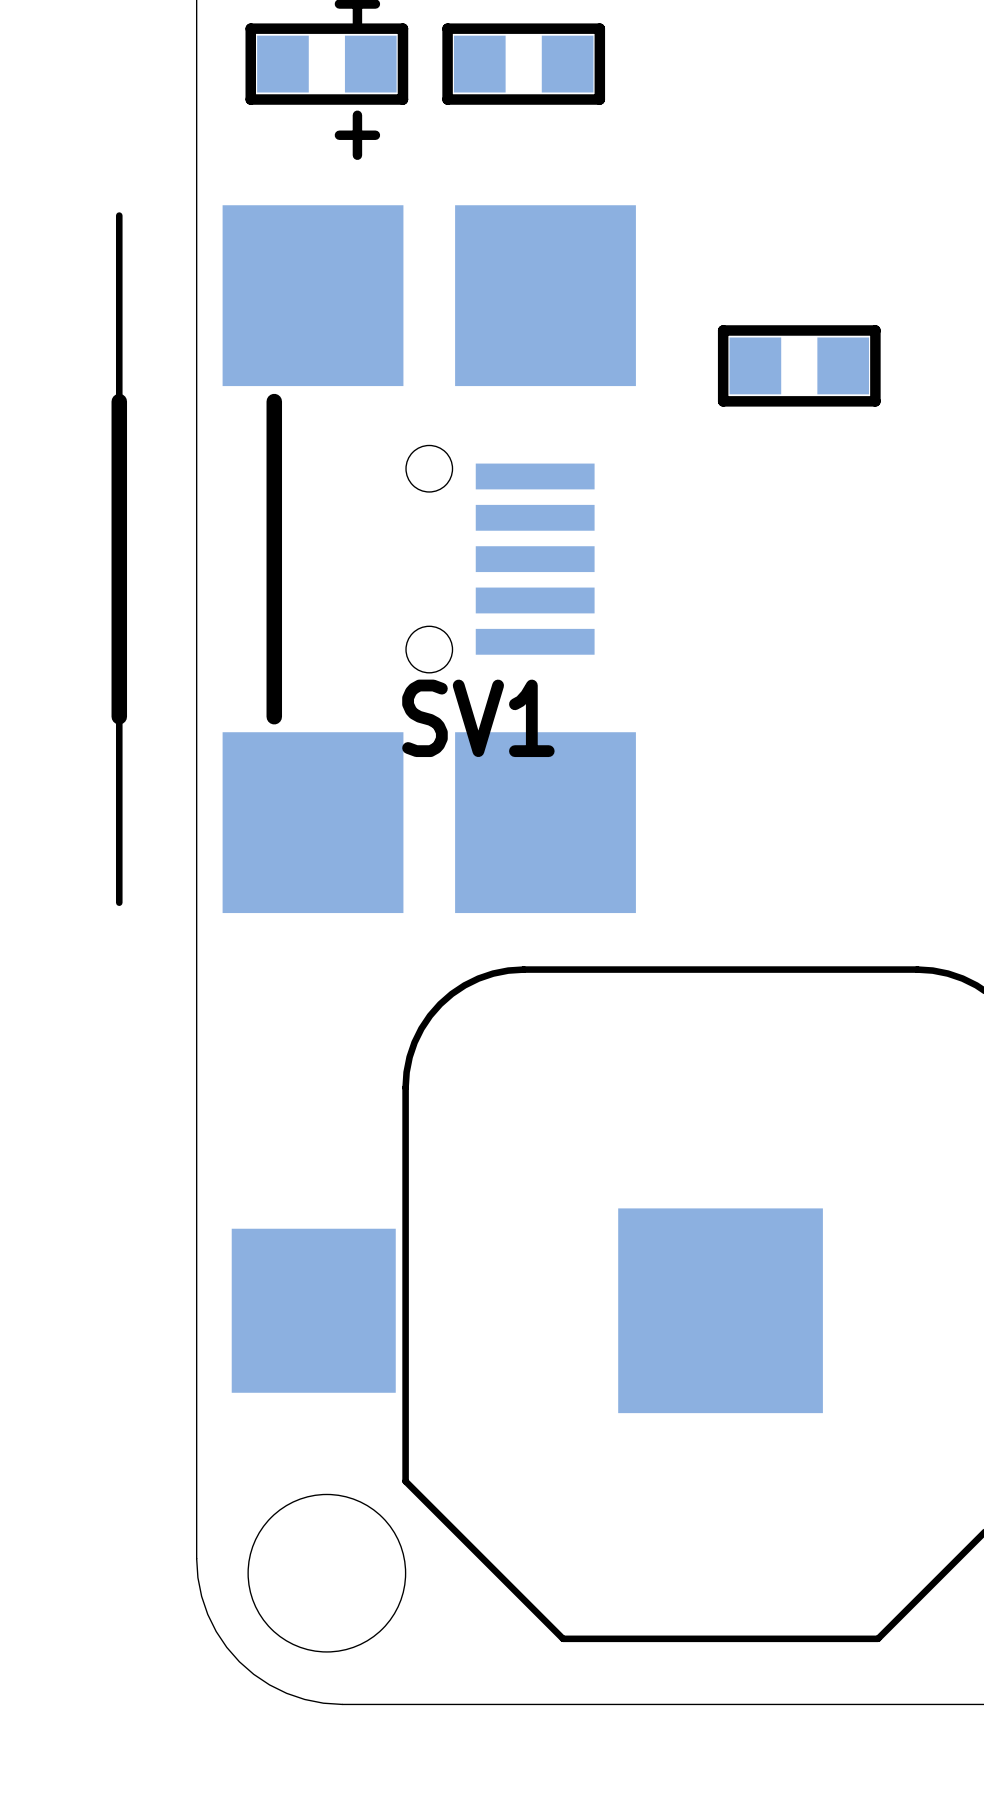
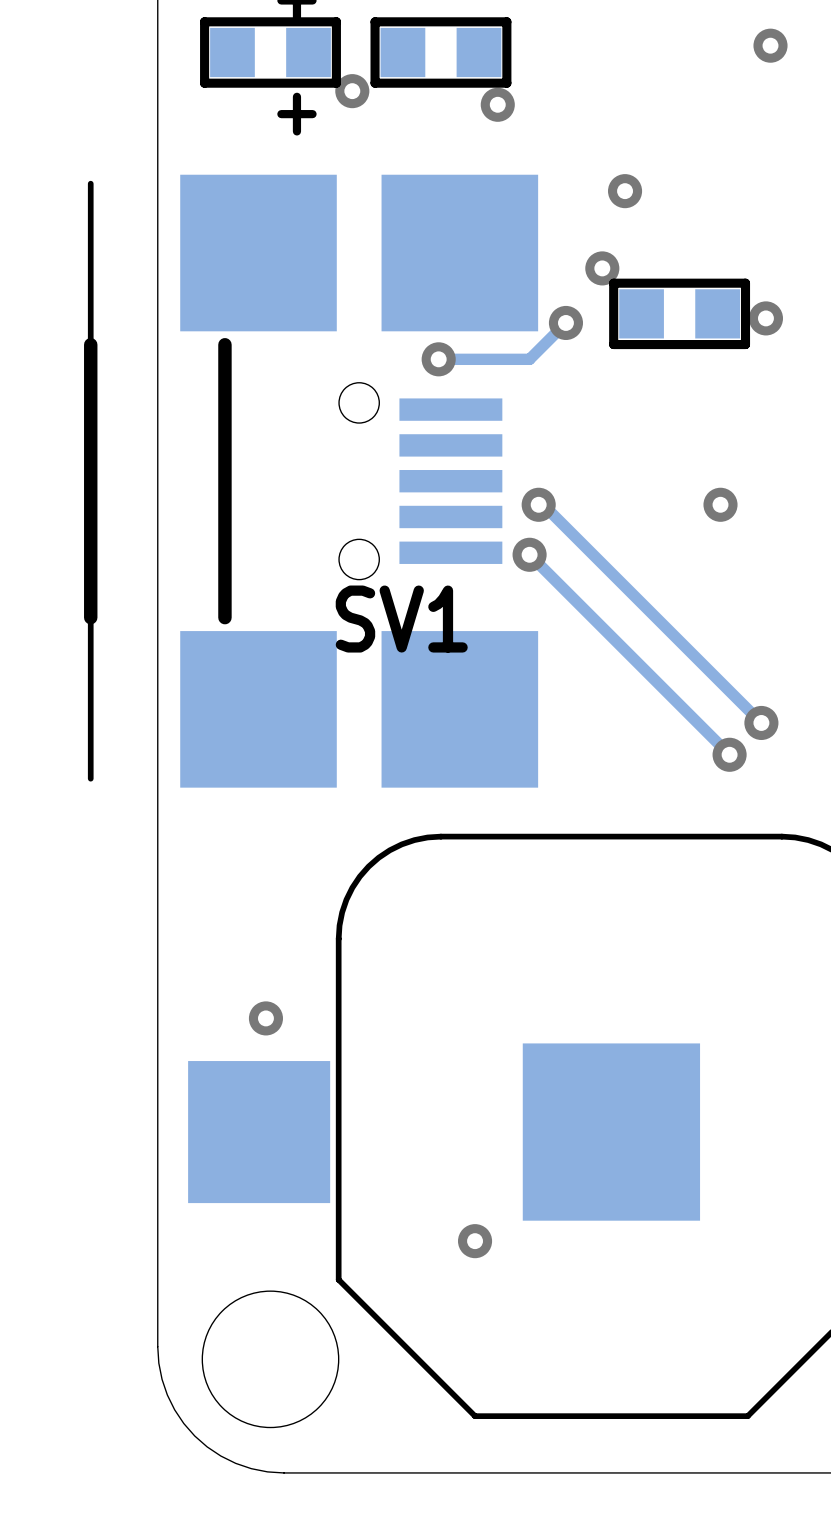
via: none -> (770, 45)
via: none -> (352, 91)
via: none -> (497, 104)
via: none -> (625, 191)
via: none -> (602, 268)
via: none -> (765, 318)
track: none -> (565, 322) (529, 359) (438, 359)
via: none -> (565, 322)
via: none -> (438, 359)
track: none -> (538, 504) (543, 504) (761, 722)
via: none -> (538, 504)
via: none -> (720, 504)
track: none -> (529, 554) (729, 754)
via: none -> (529, 554)
via: none -> (761, 722)
via: none -> (729, 754)
via: none -> (265, 1018)
via: none -> (475, 1241)

